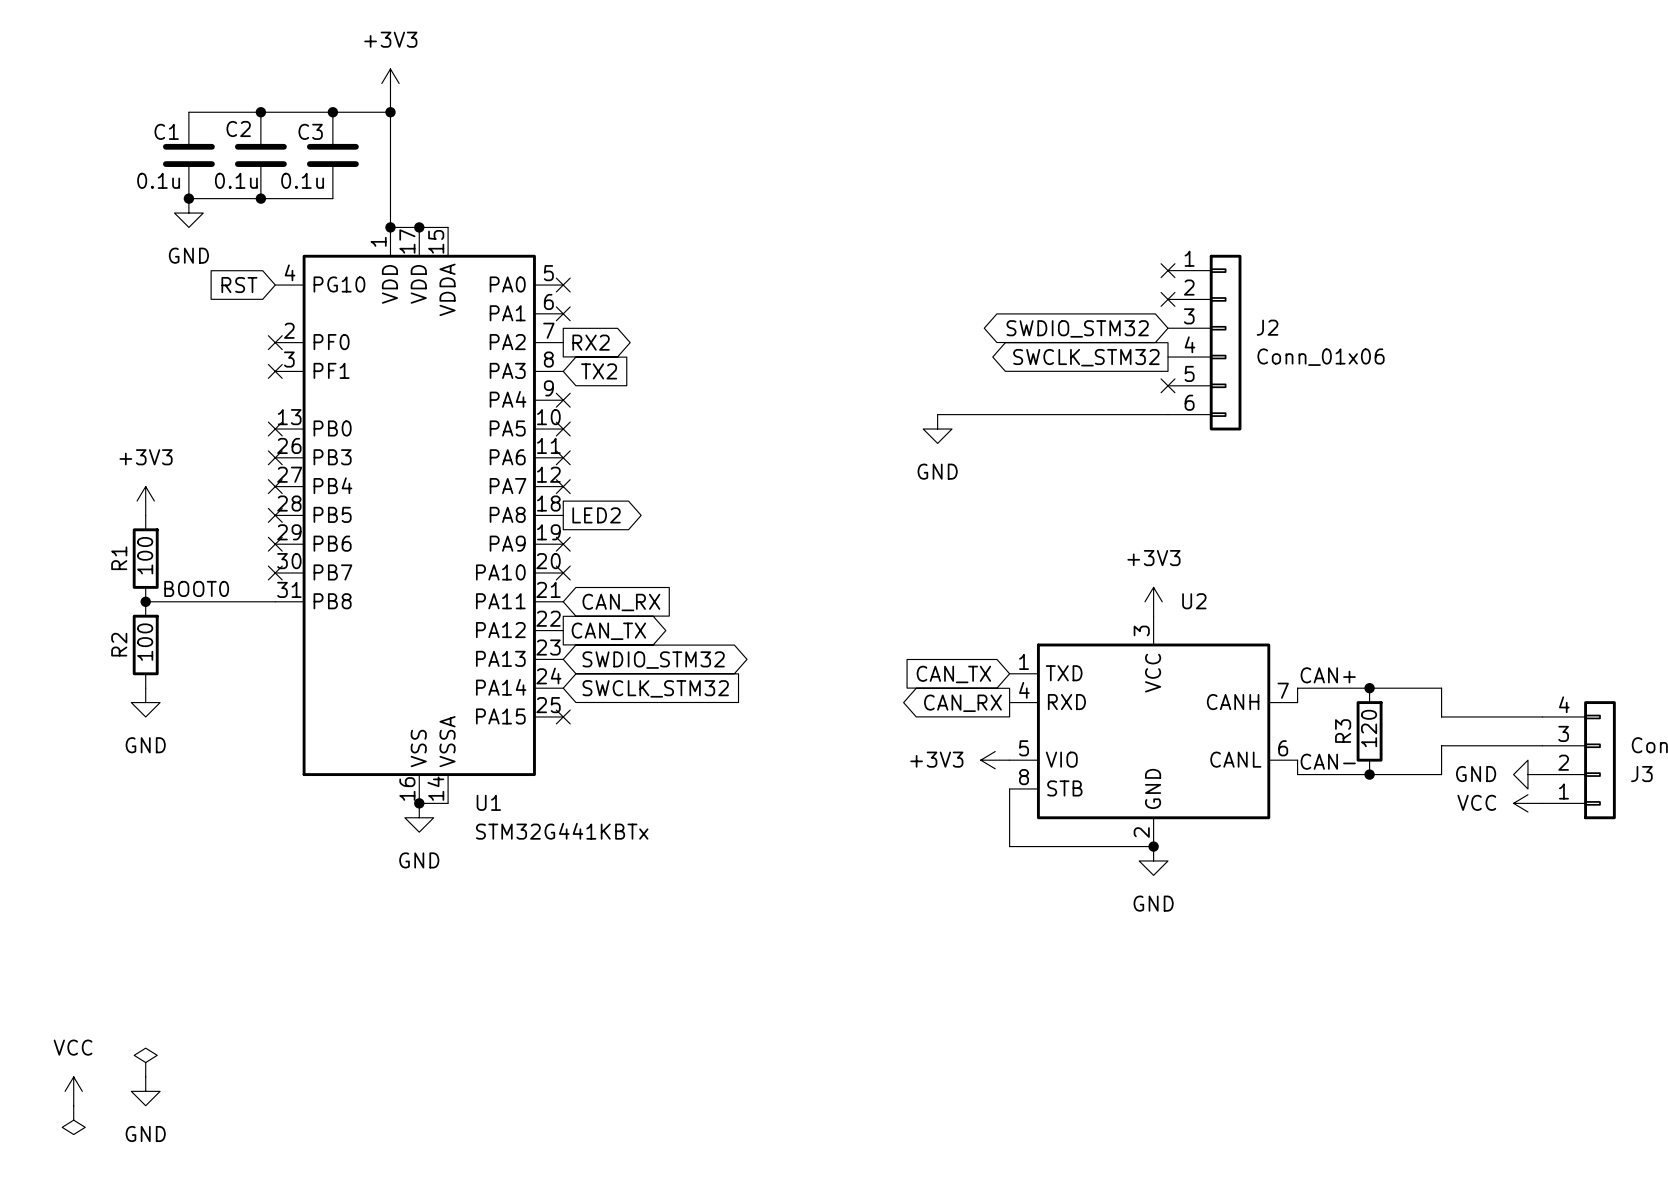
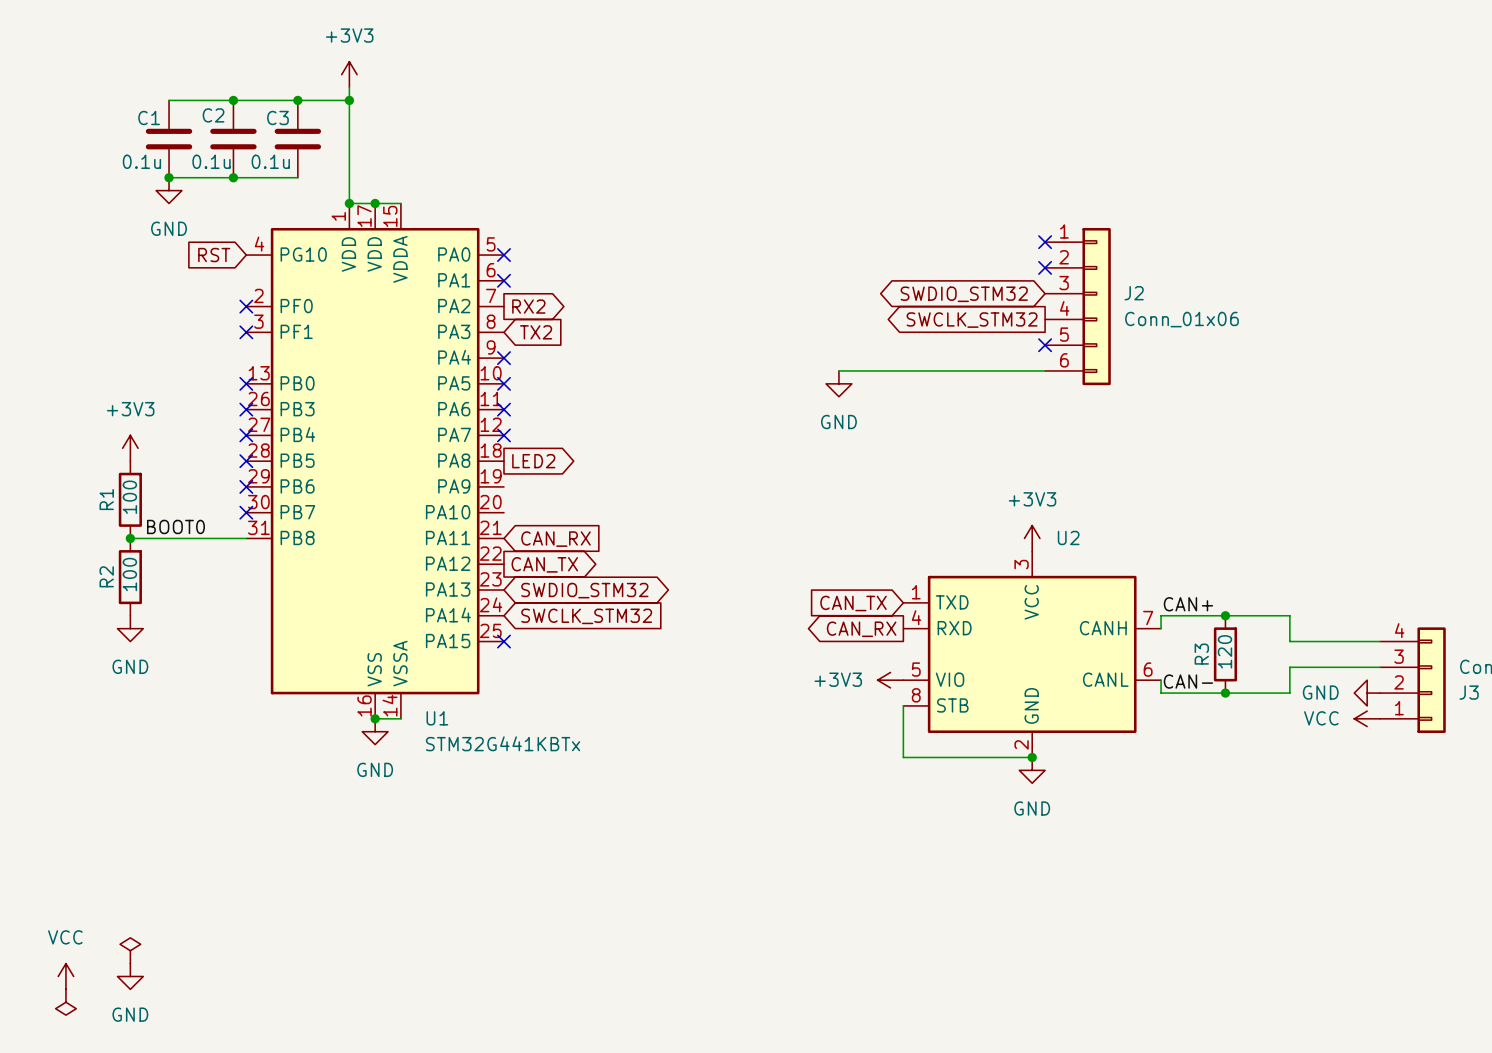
no-connect mark: (563, 544) -> none
no-connect mark: (563, 573) -> none

